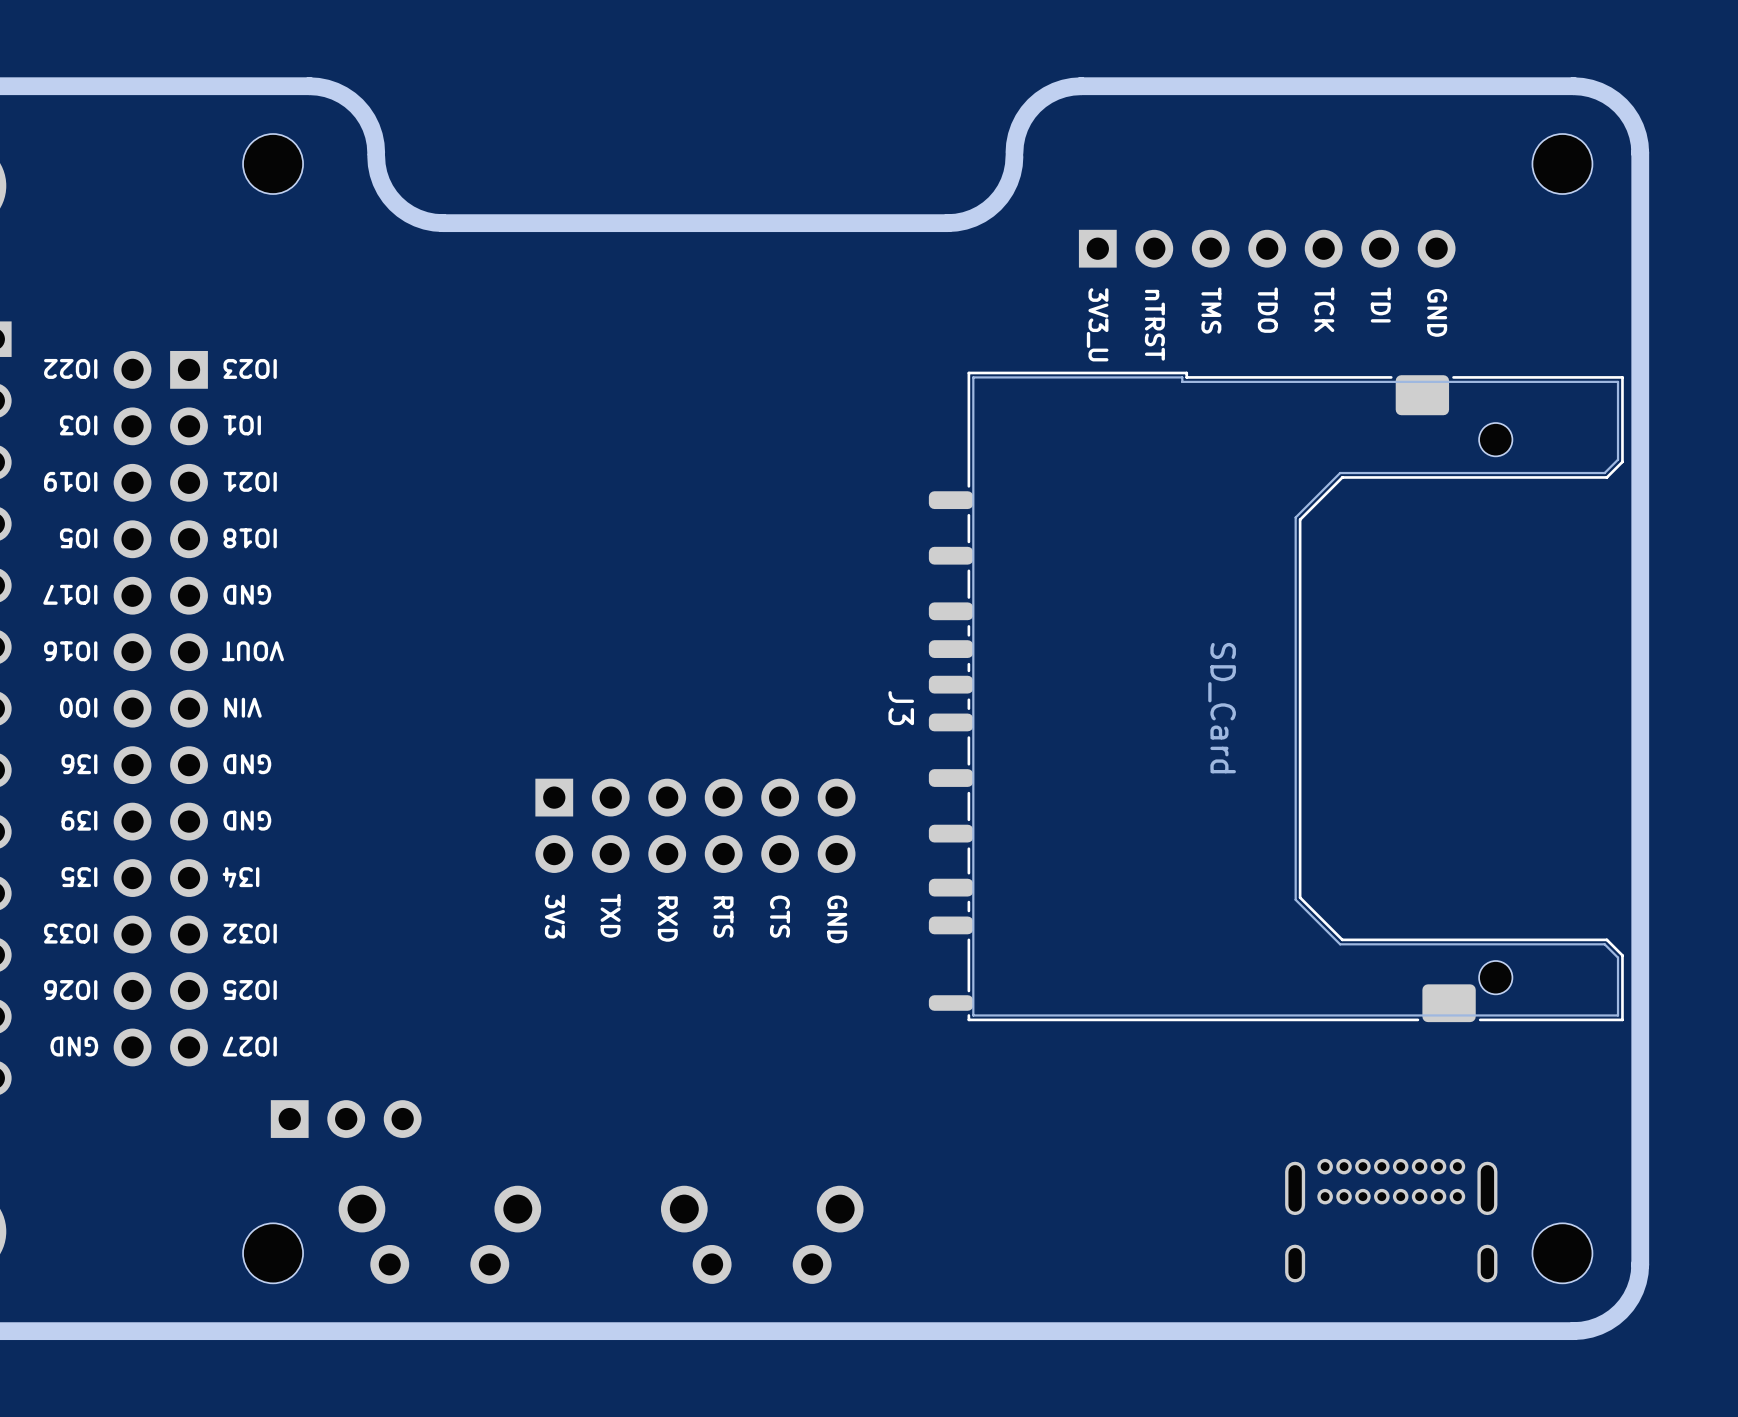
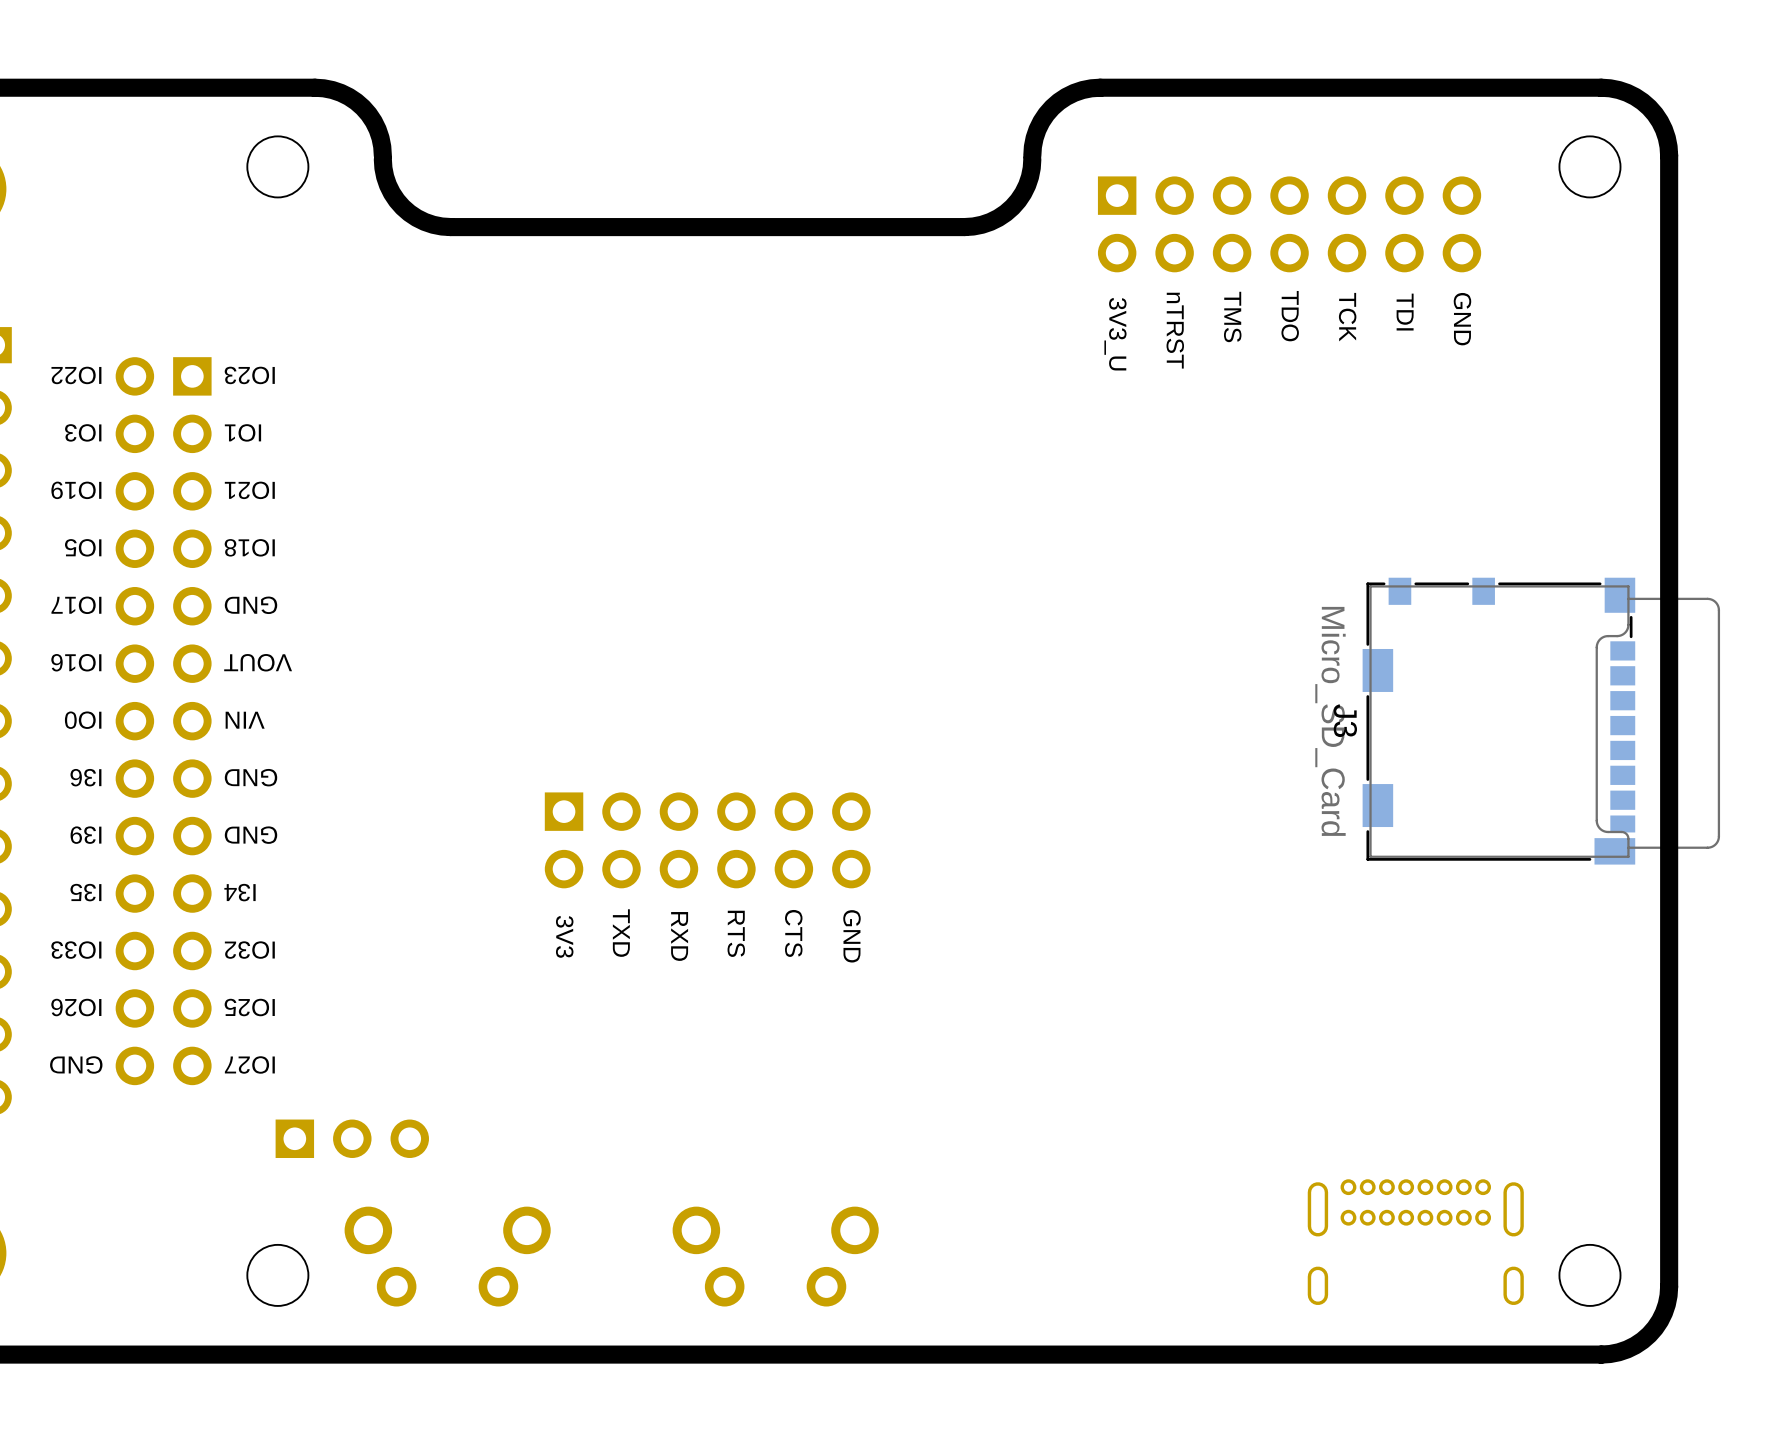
part: none -> (1289, 224)
part: (1267, 248) -> none
J3 footprint: [928, 371, 1624, 1023] -> [1362, 577, 1721, 865]
J3 name position: J3 (901, 708) -> J3 (1345, 720)
J3 value: SD_Card (1222, 708) -> Micro_SD_Card (1330, 721)

